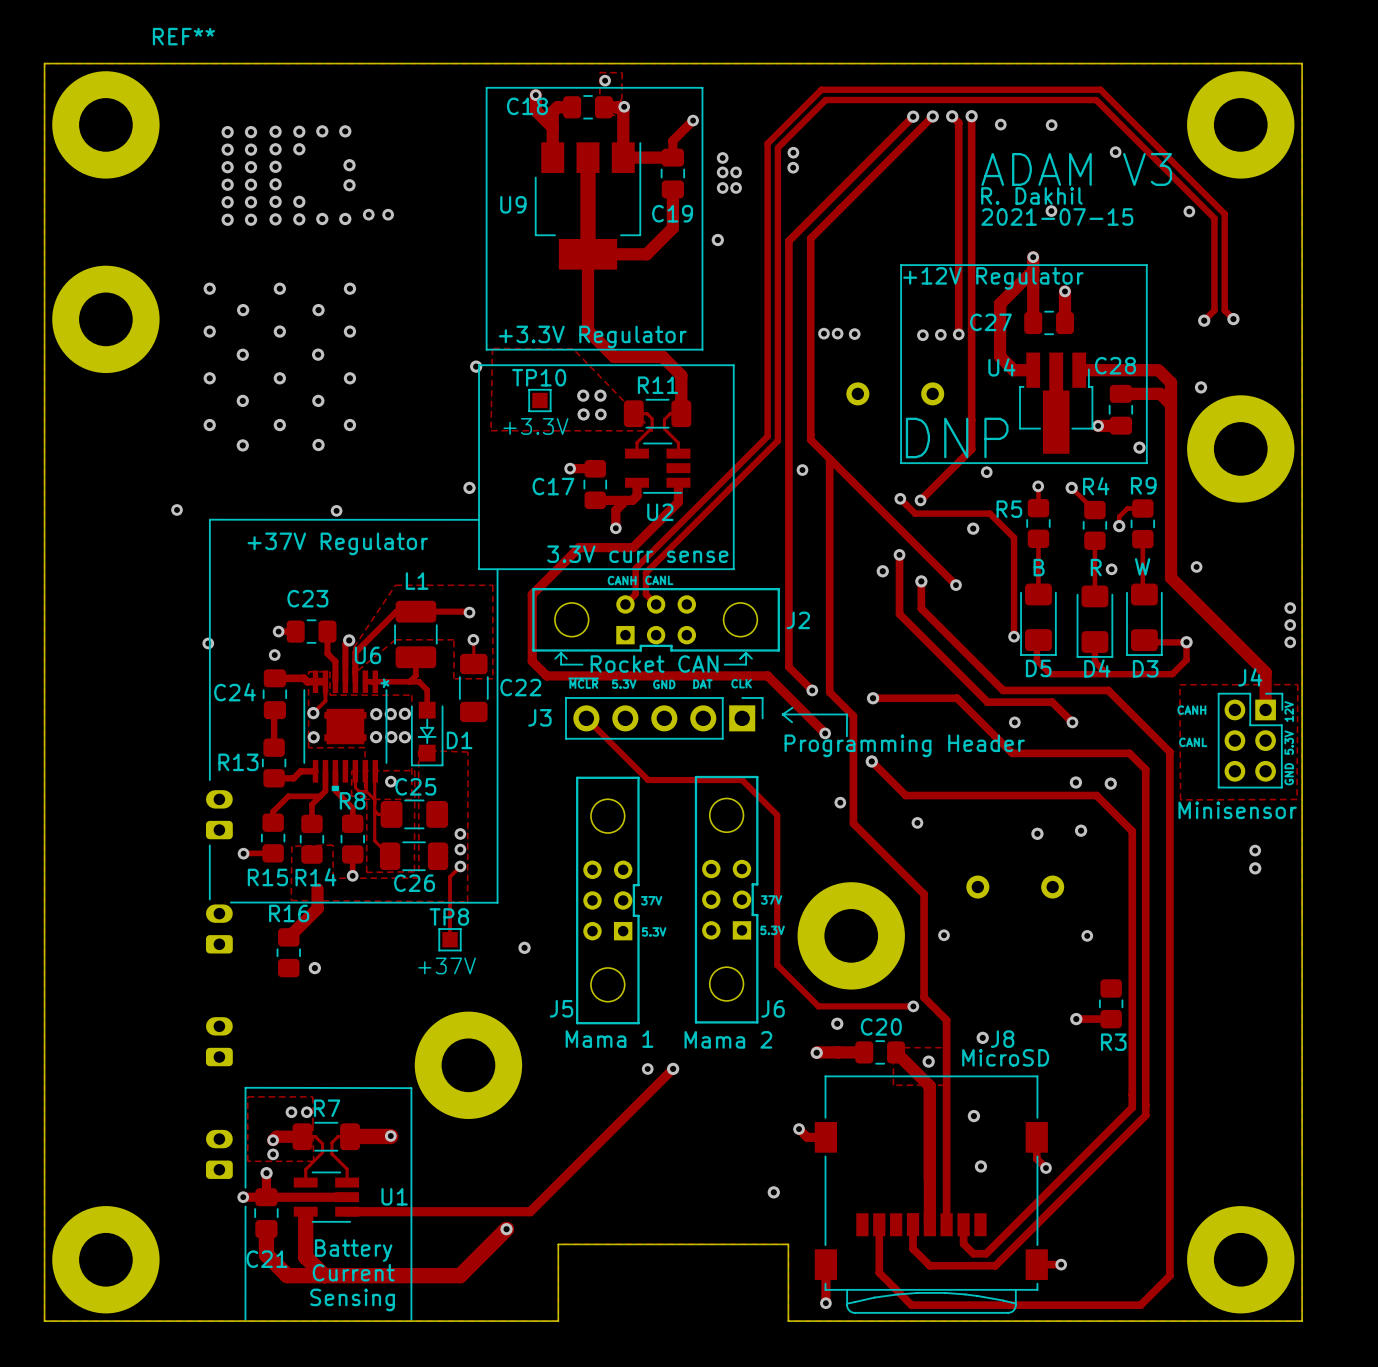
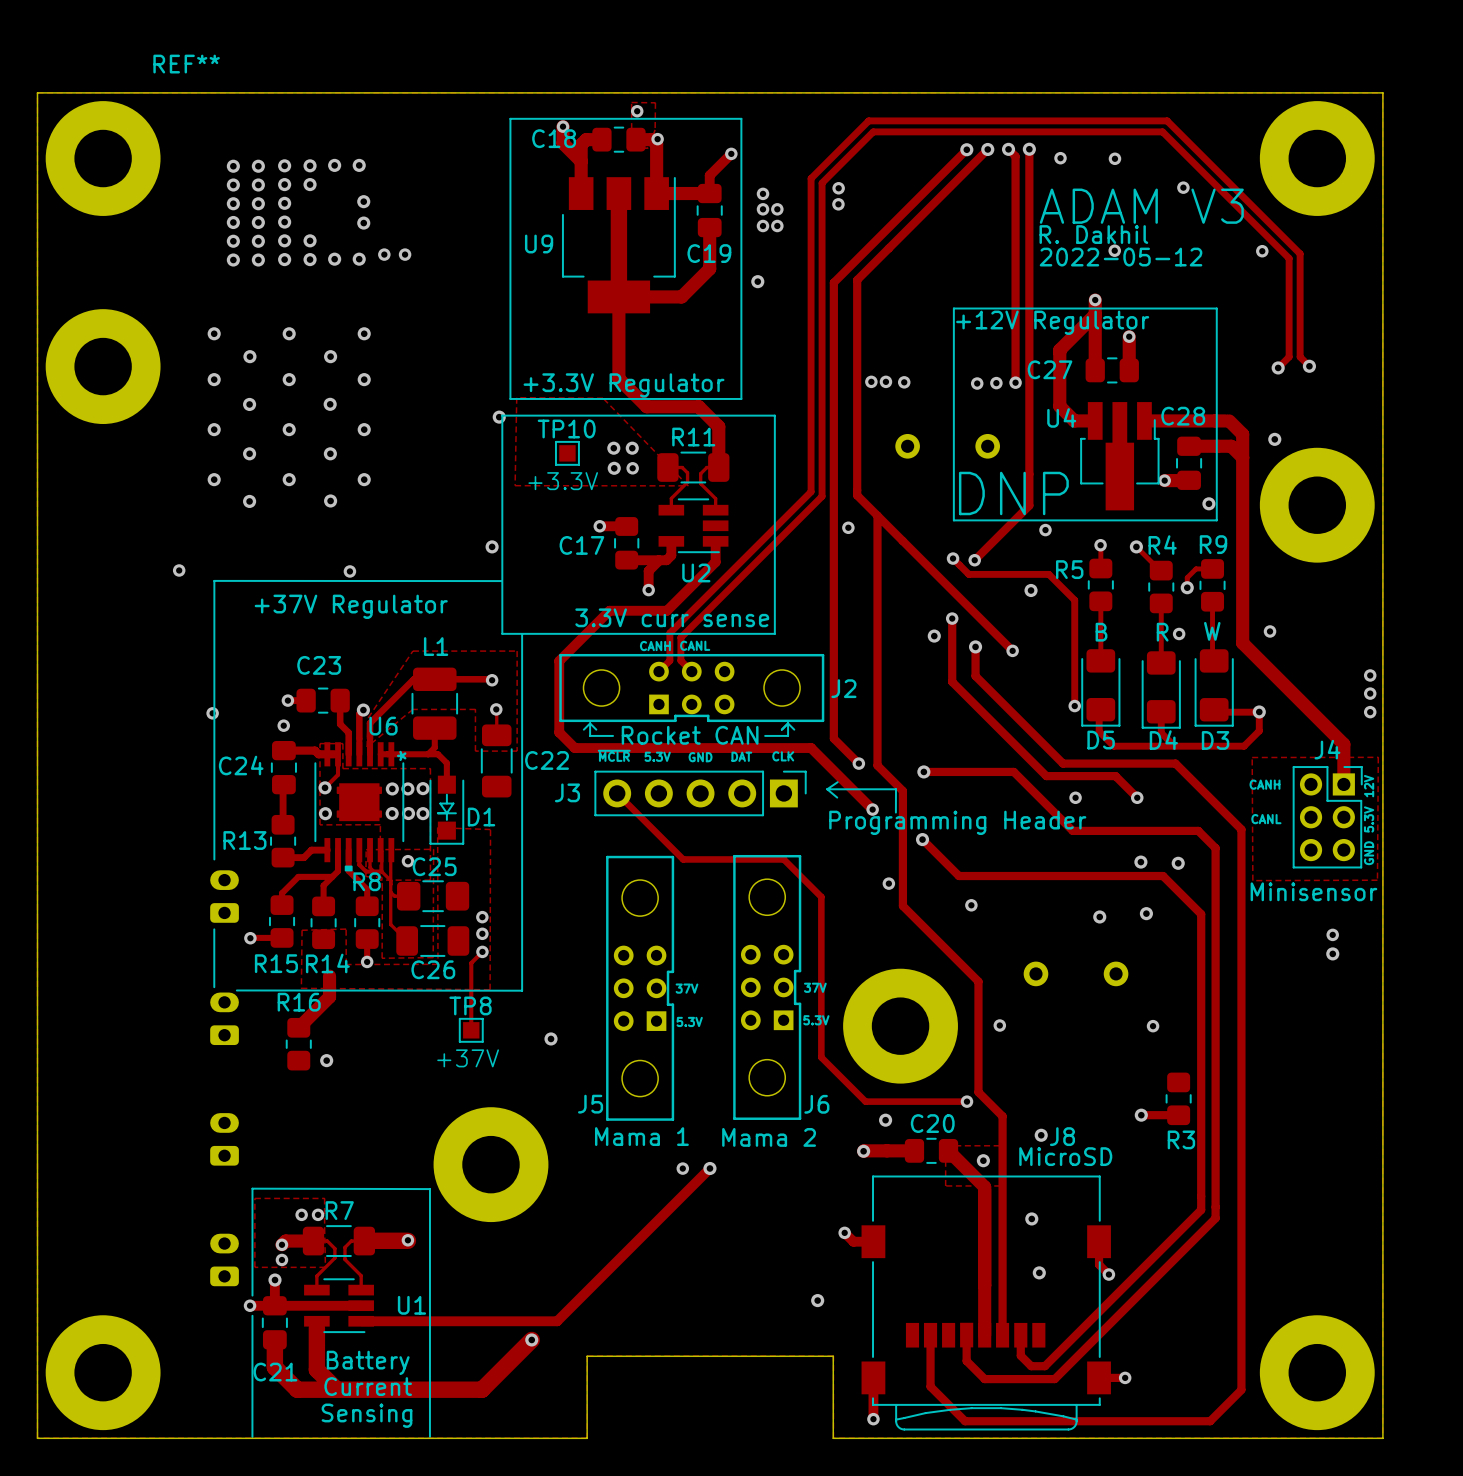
text: 2021-07-15 (1057, 217) -> 2022-05-12 (1121, 257)
track: none -> (359, 850) (359, 864) (366, 871) (381, 871)

